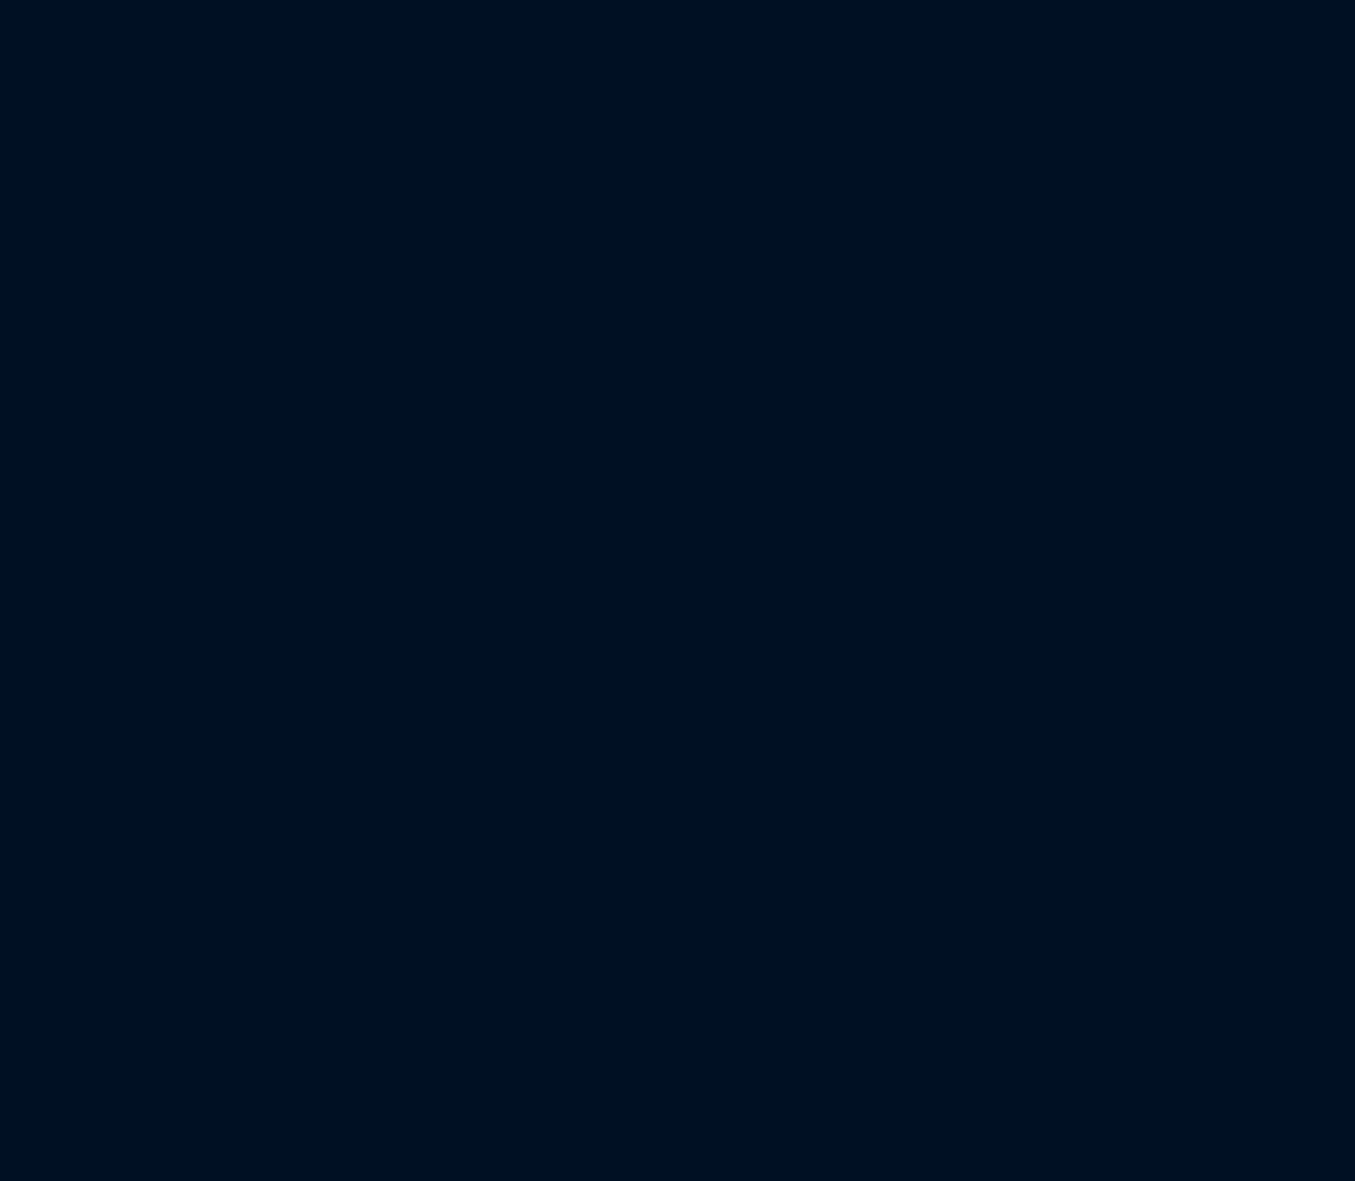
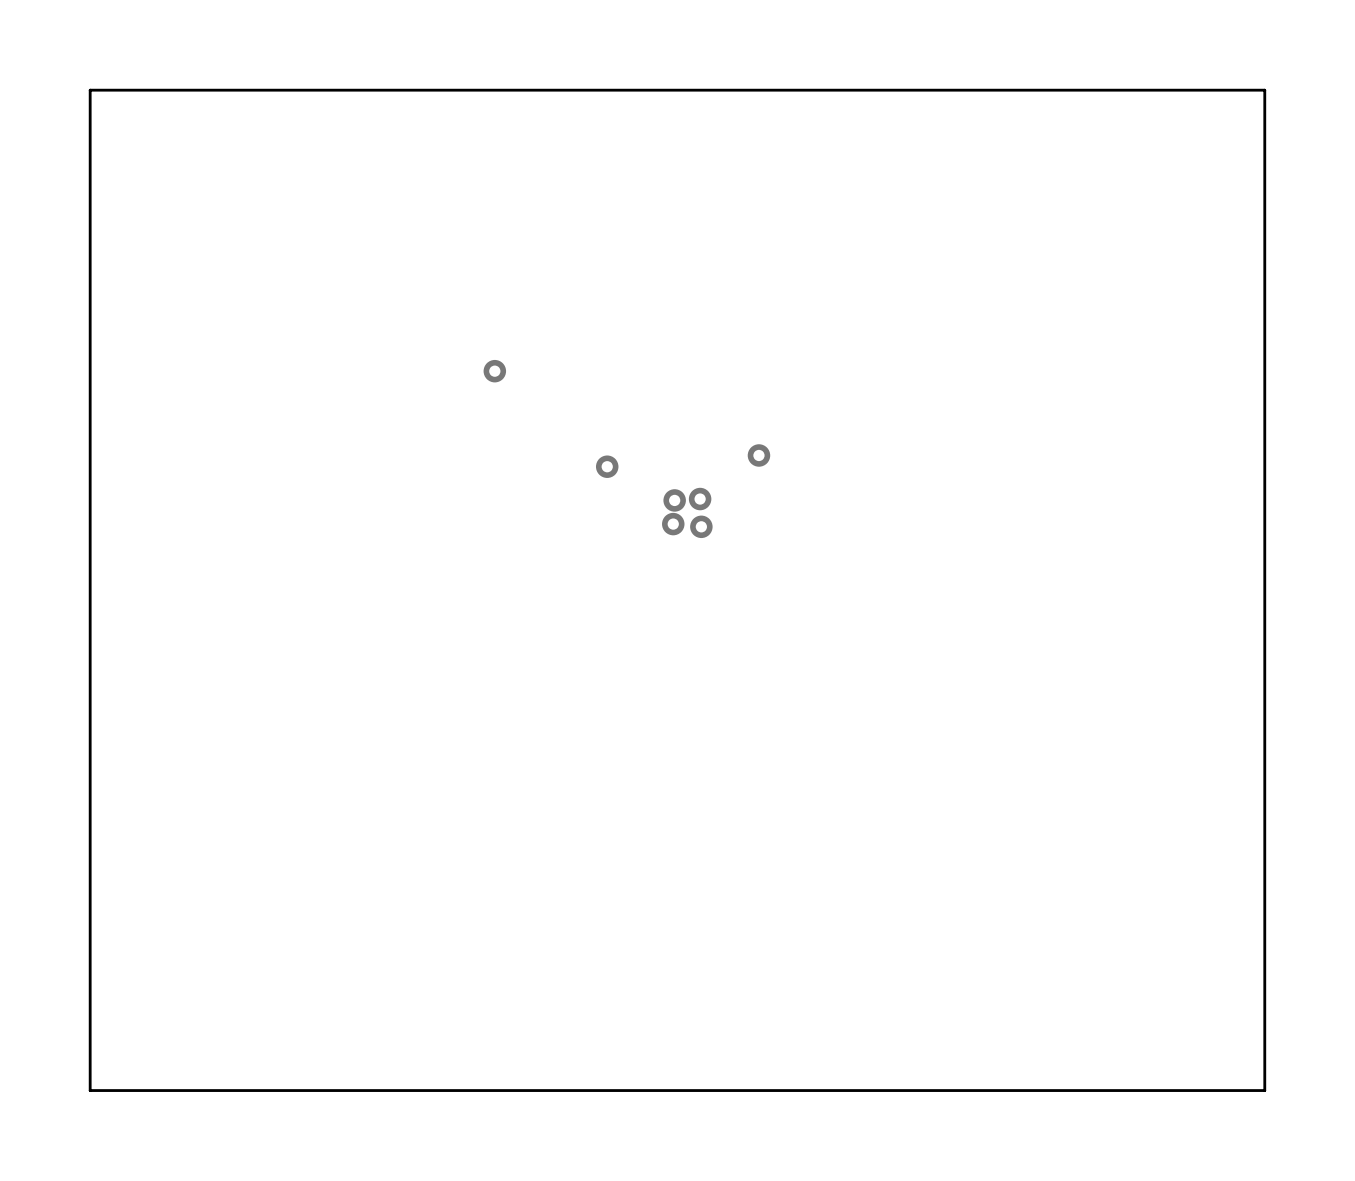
board edge: none -> (1264, 90) (90, 90) (90, 1090) (1264, 1090) (1264, 90)
via: none -> (494, 371)
via: none -> (758, 455)
via: none -> (607, 466)
via: none -> (700, 499)
via: none -> (674, 500)
via: none -> (673, 524)
via: none -> (701, 526)

